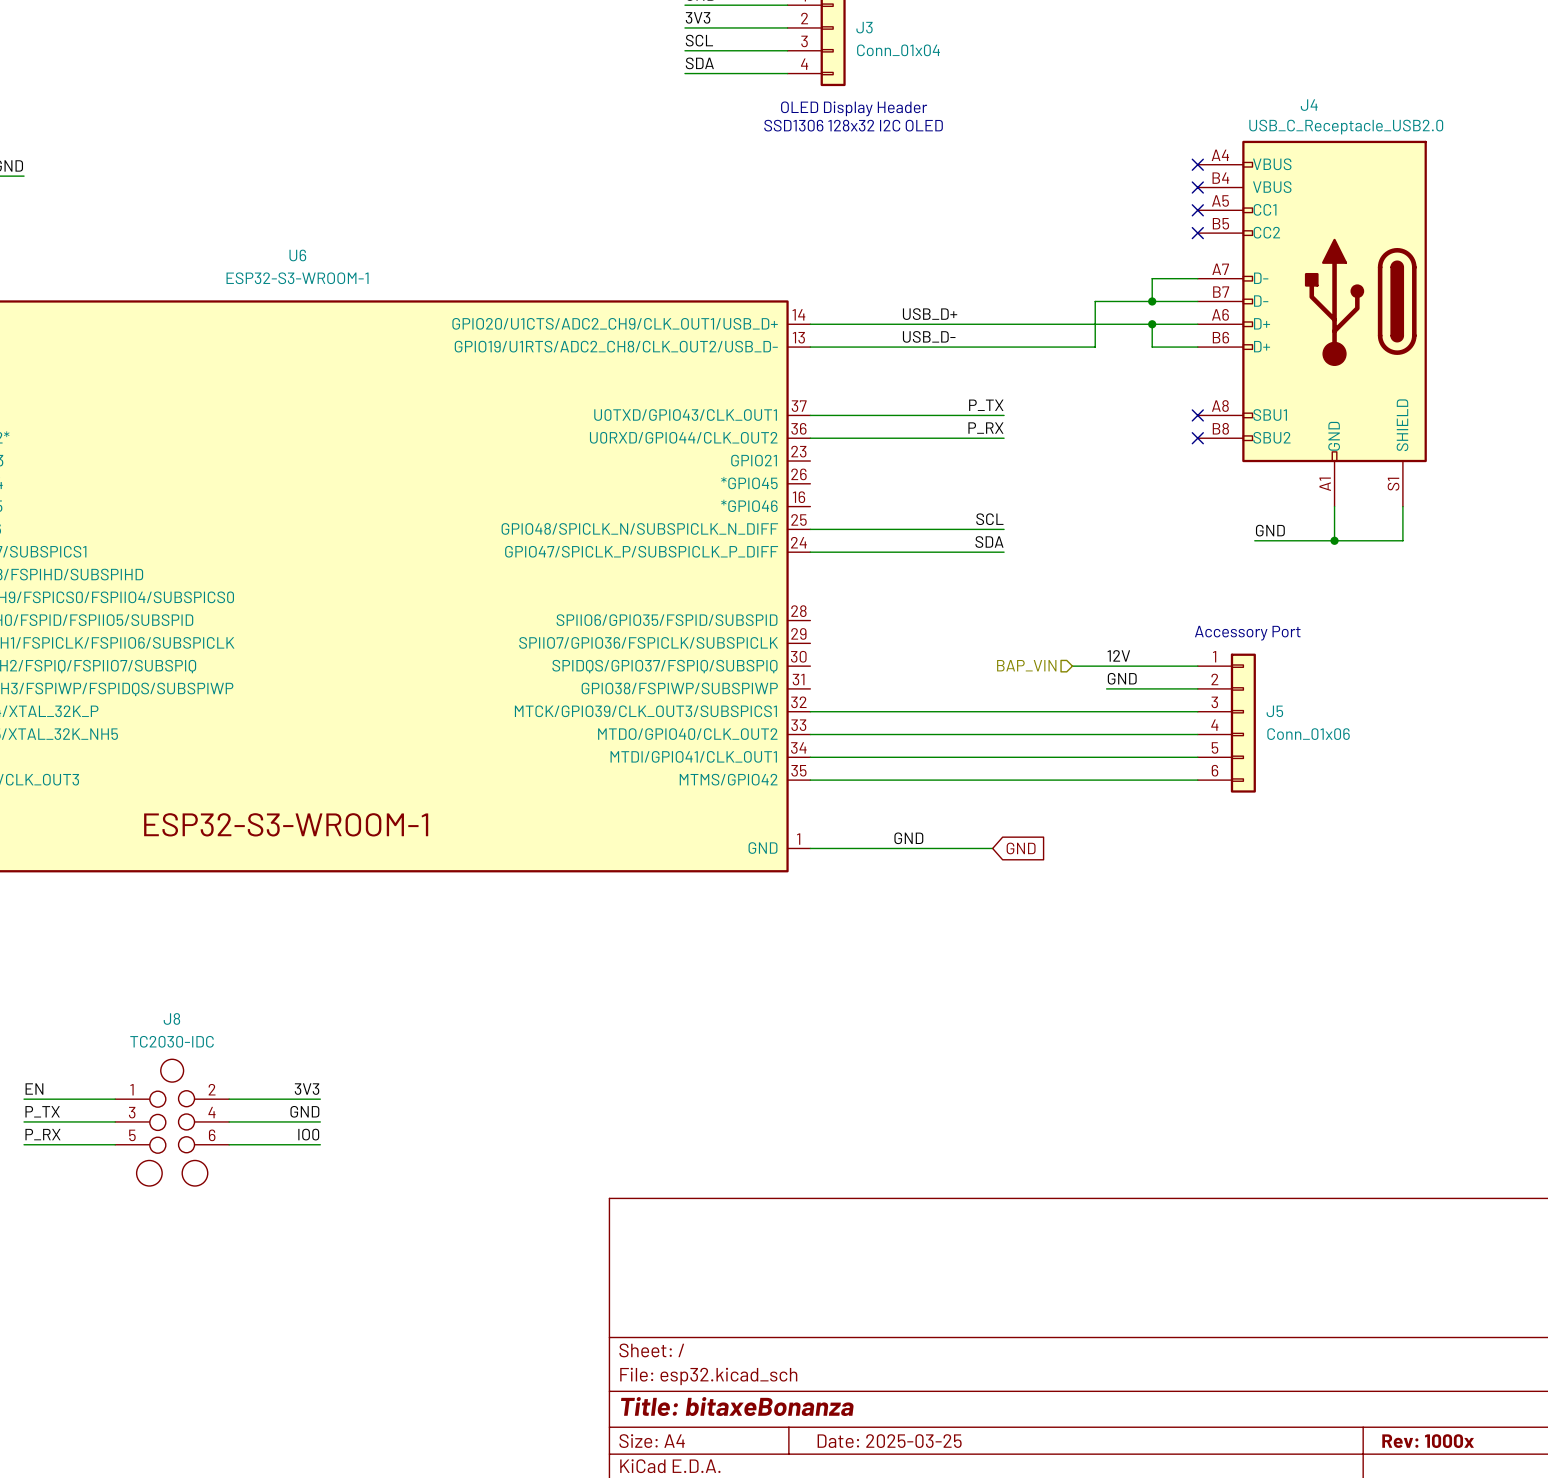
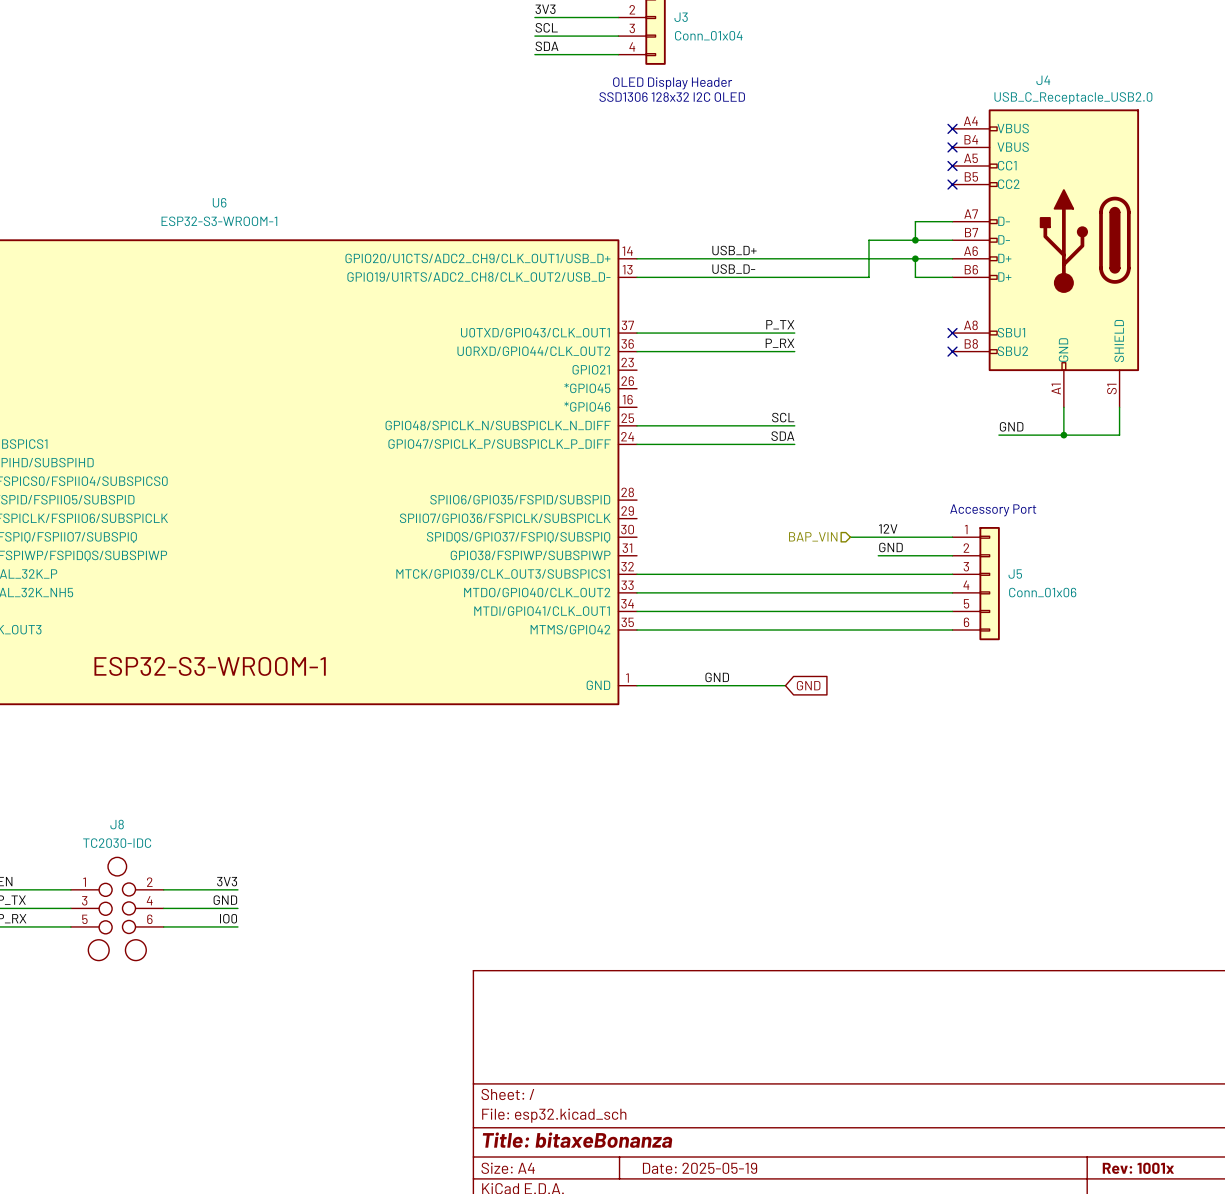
title block: Date: 2025-03-25 (889, 1441) -> Date: 2025-05-19 (700, 1168)
title block: Rev: 1000x (1428, 1441) -> Rev: 1001x (1138, 1168)

